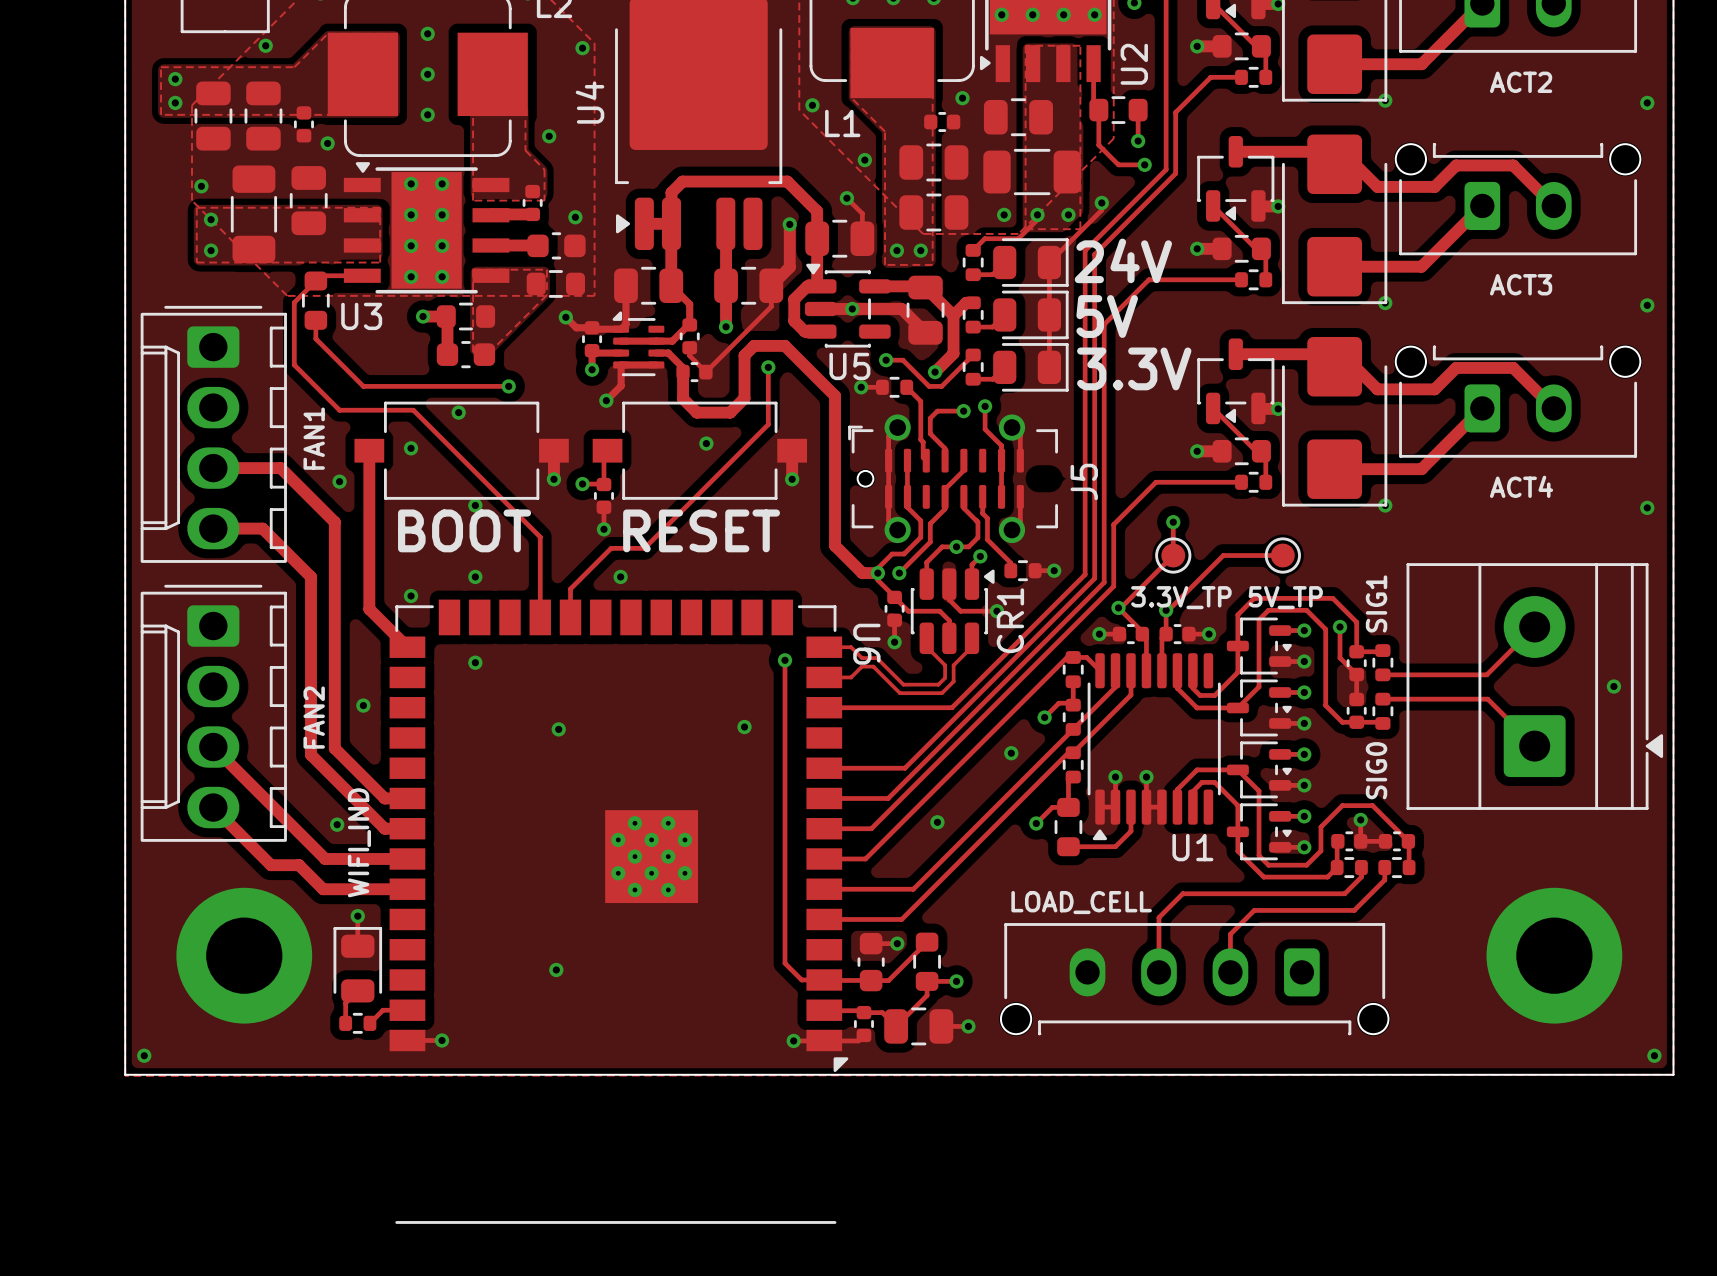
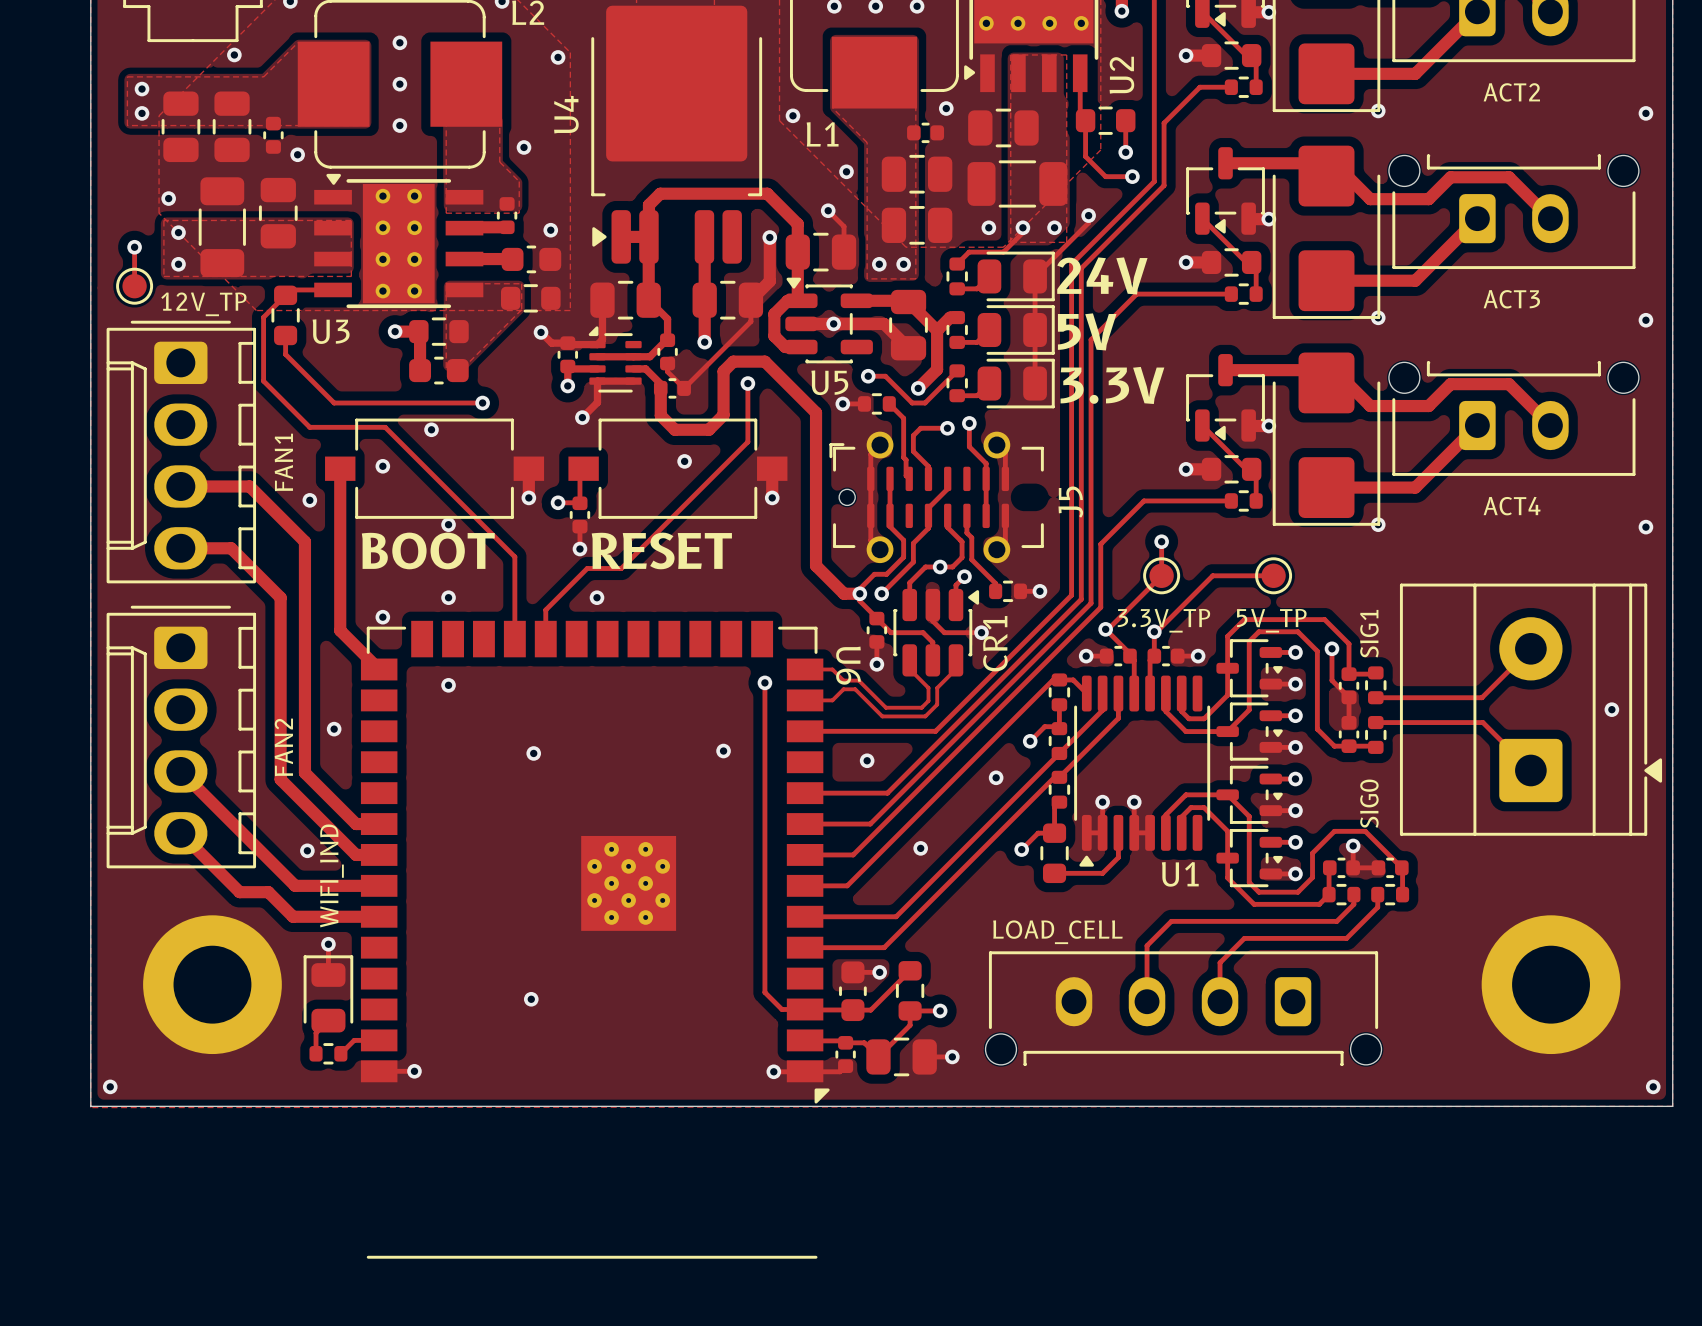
track: none -> (134, 247) (134, 286)
via: none -> (134, 247)
part: none -> (134, 286)
text: none -> 12V_TP (203, 304)
via: none -> (867, 760)

